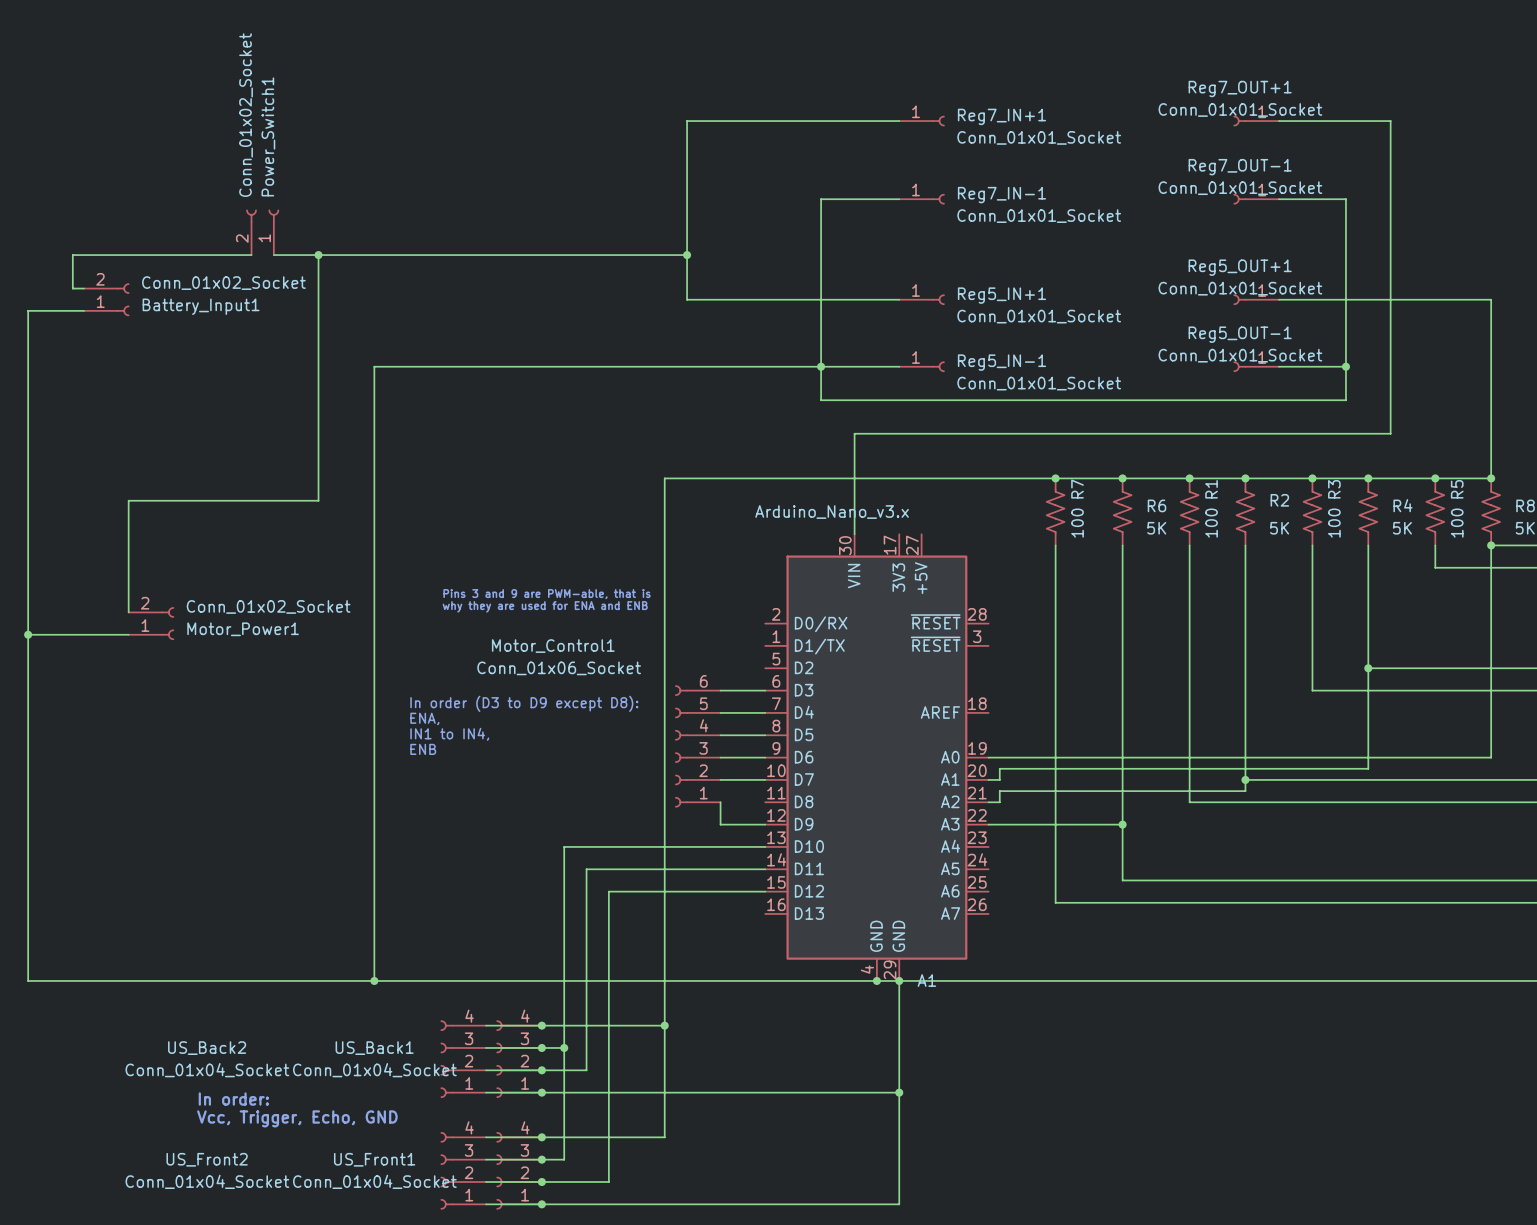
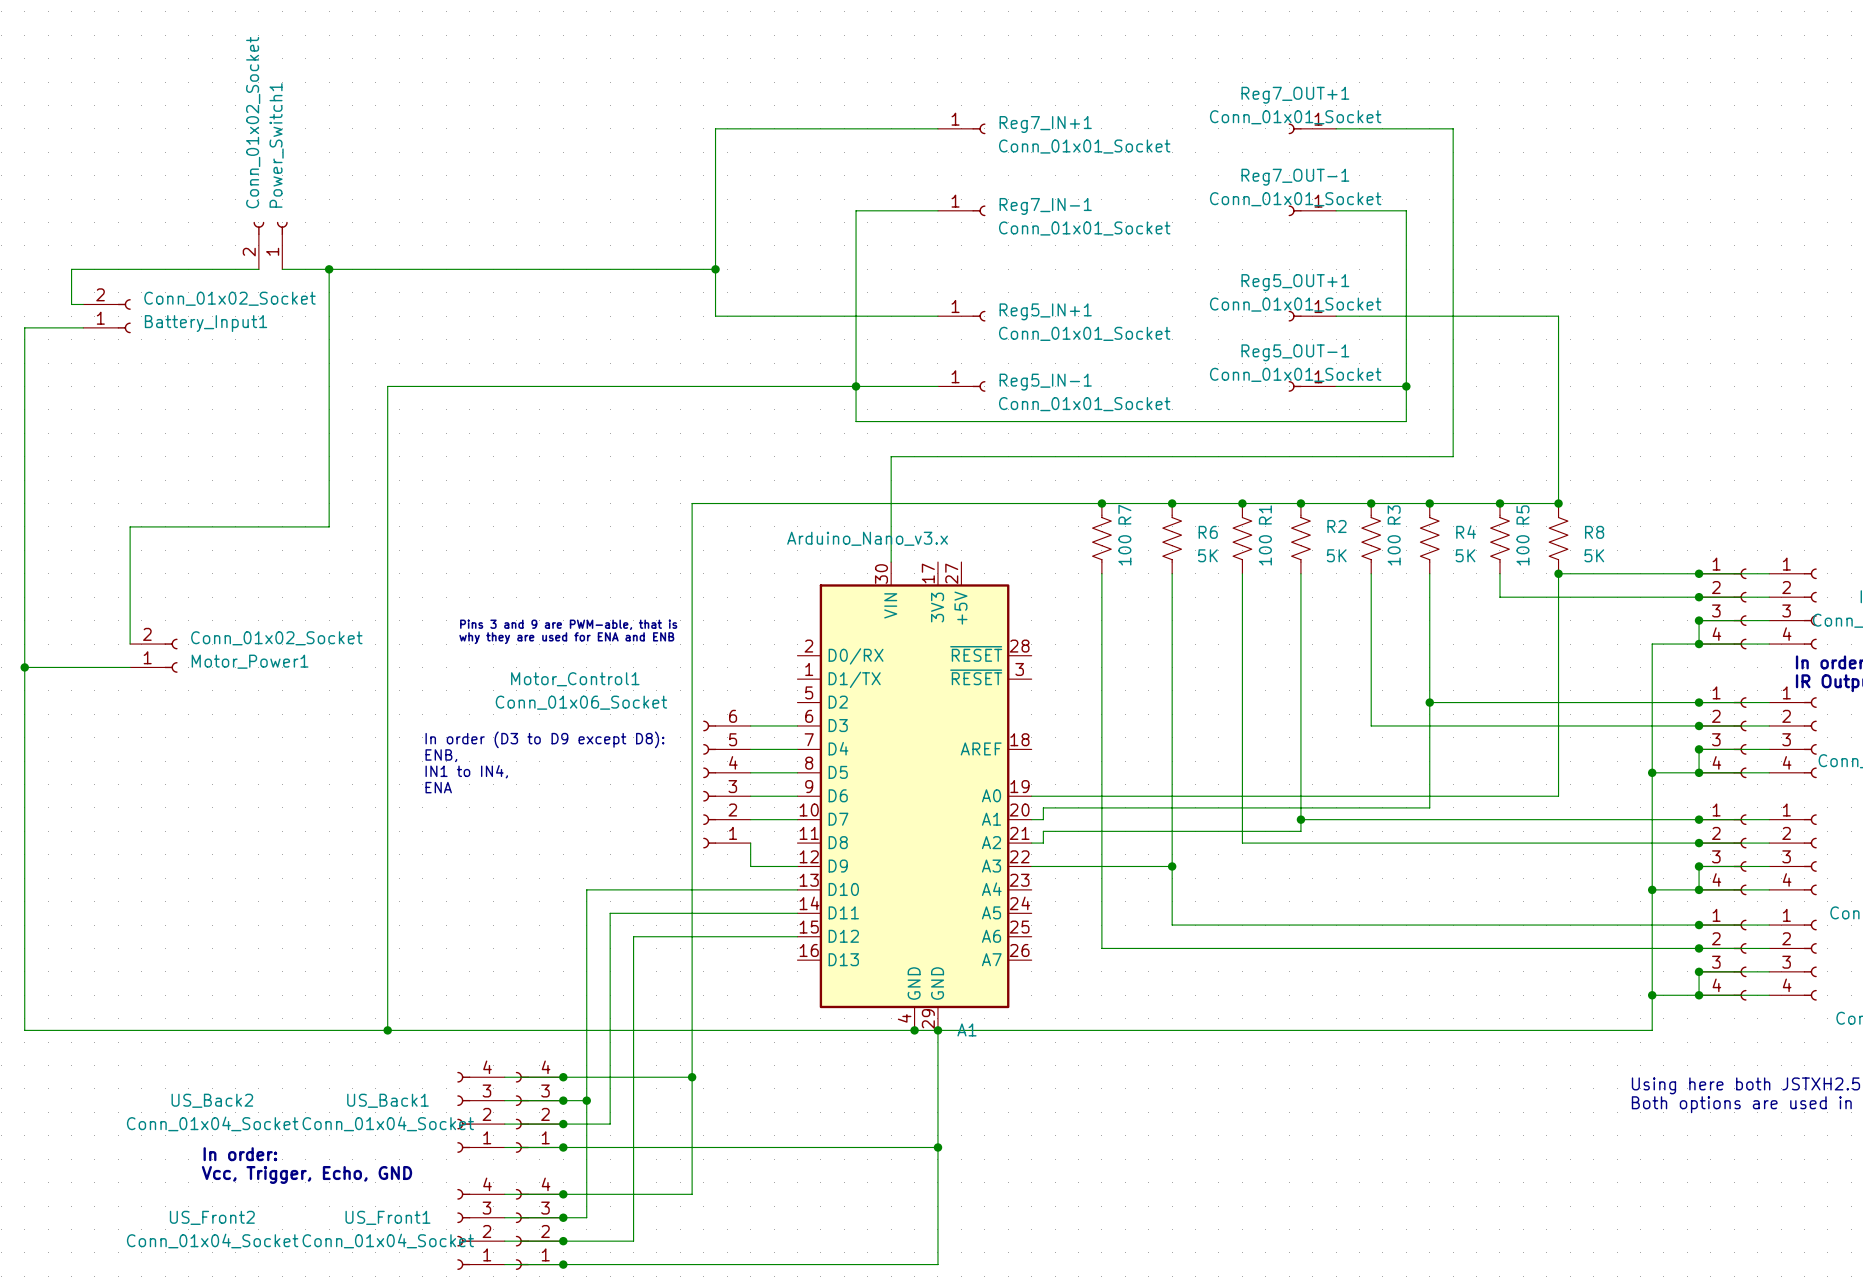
text: ENA, (424, 718) -> ENB, (441, 755)
text: ENB (423, 749) -> ENA (438, 787)

